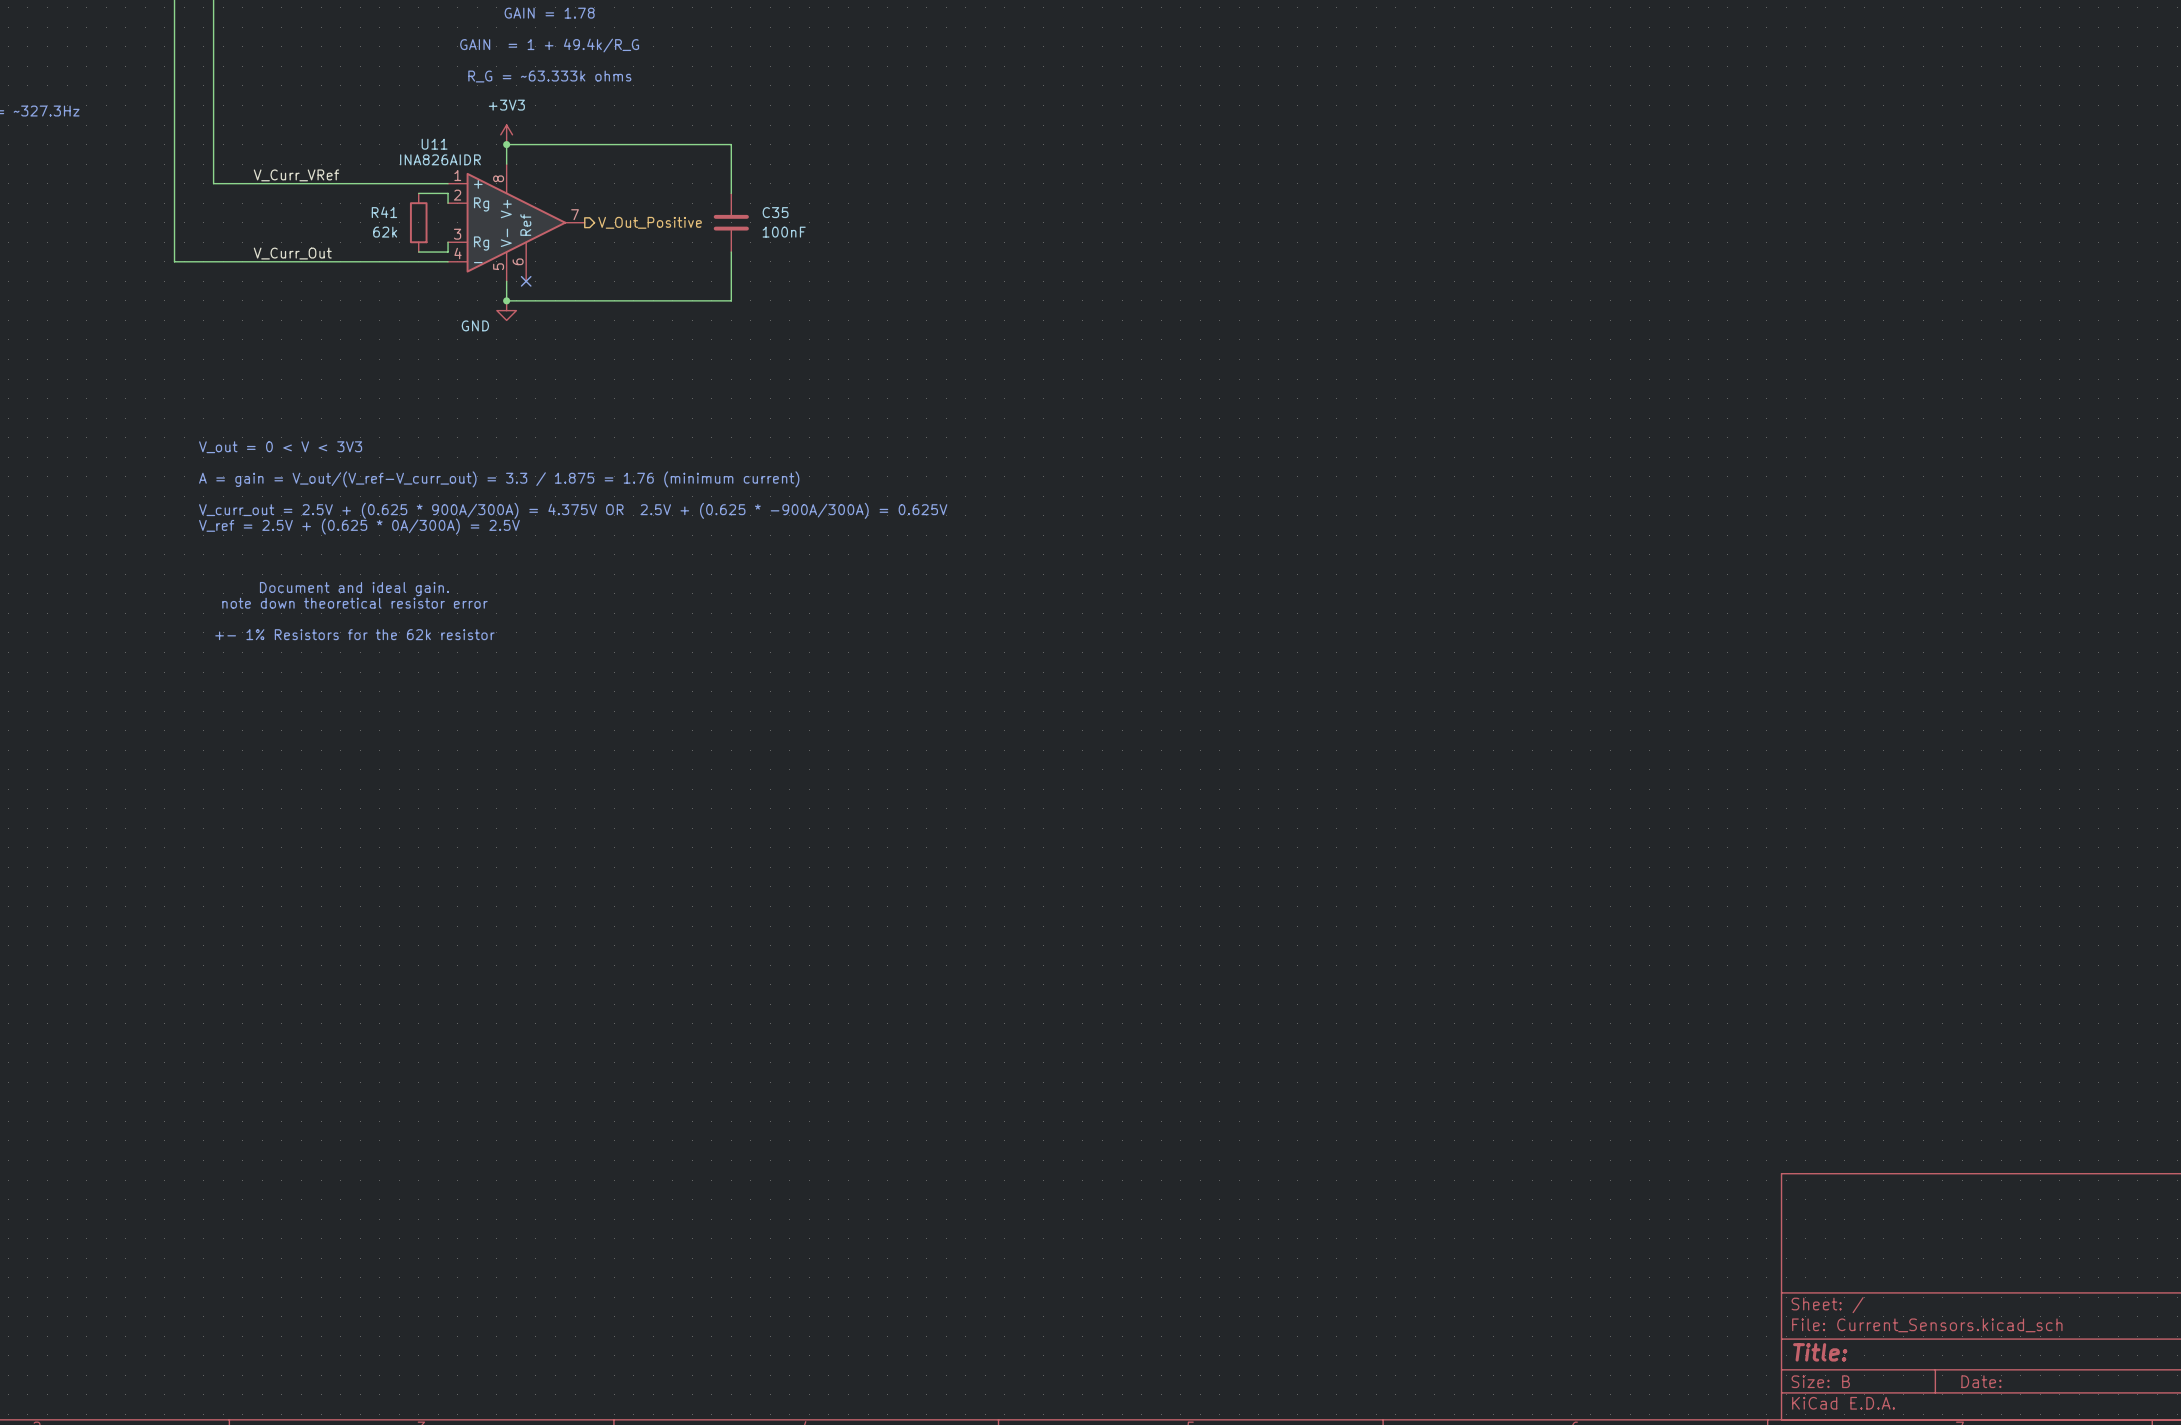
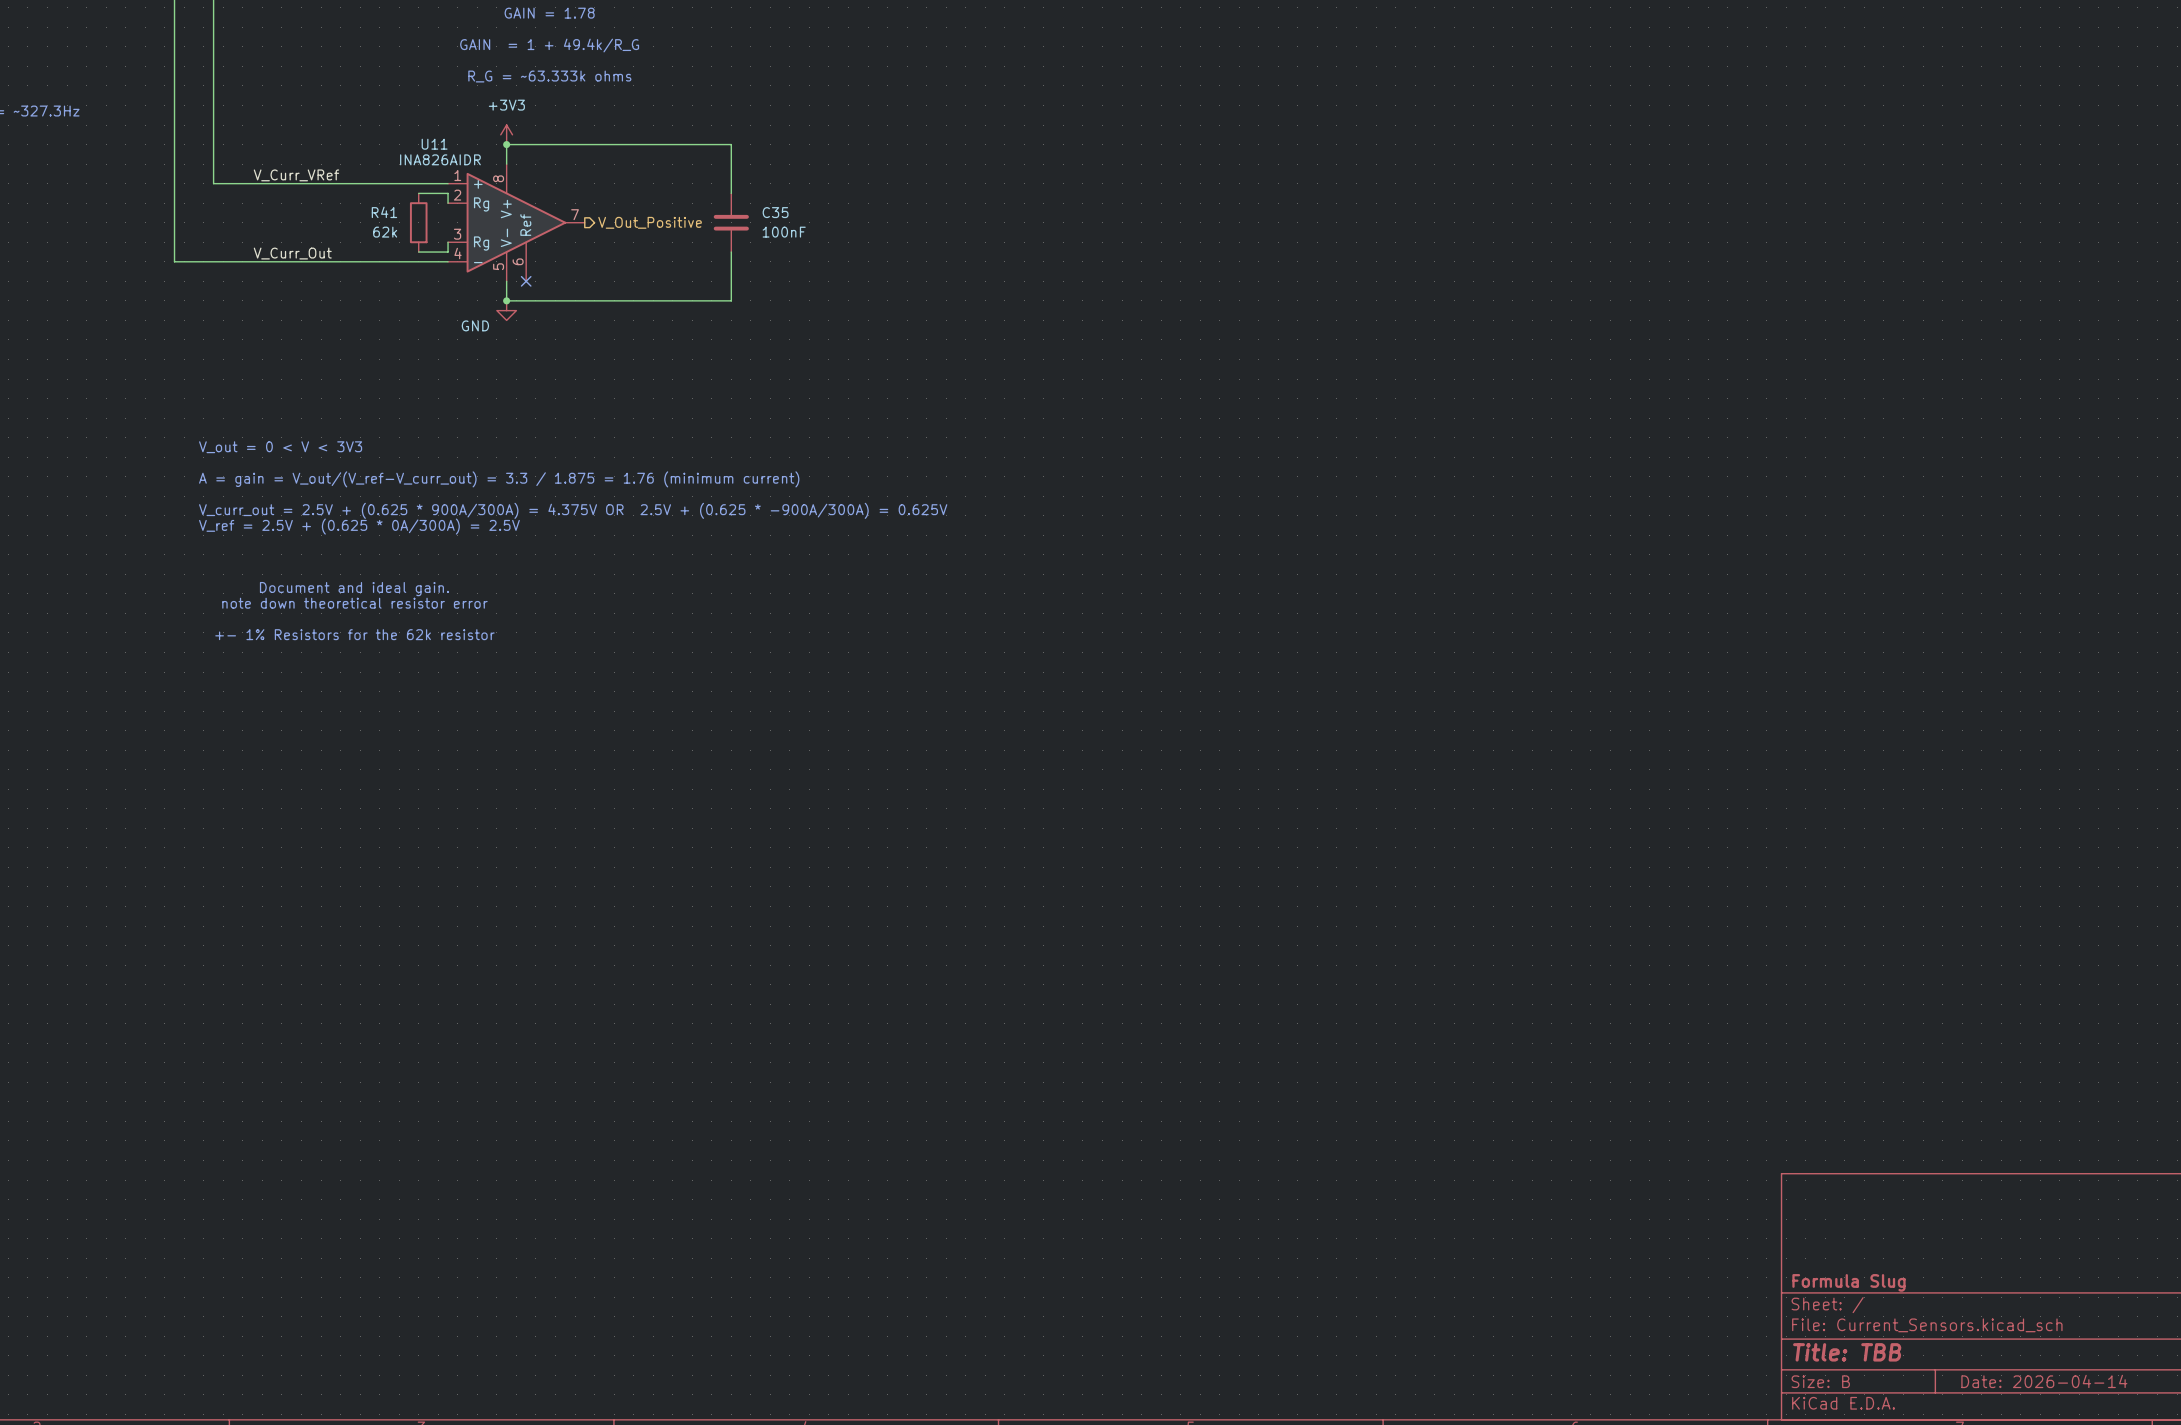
title block: none -> Formula Slug (1848, 1282)
title block: Title: (1820, 1352) -> Title: TBB (1847, 1352)
title block: Date: (1981, 1381) -> Date: 2026-04-14 (2044, 1381)

